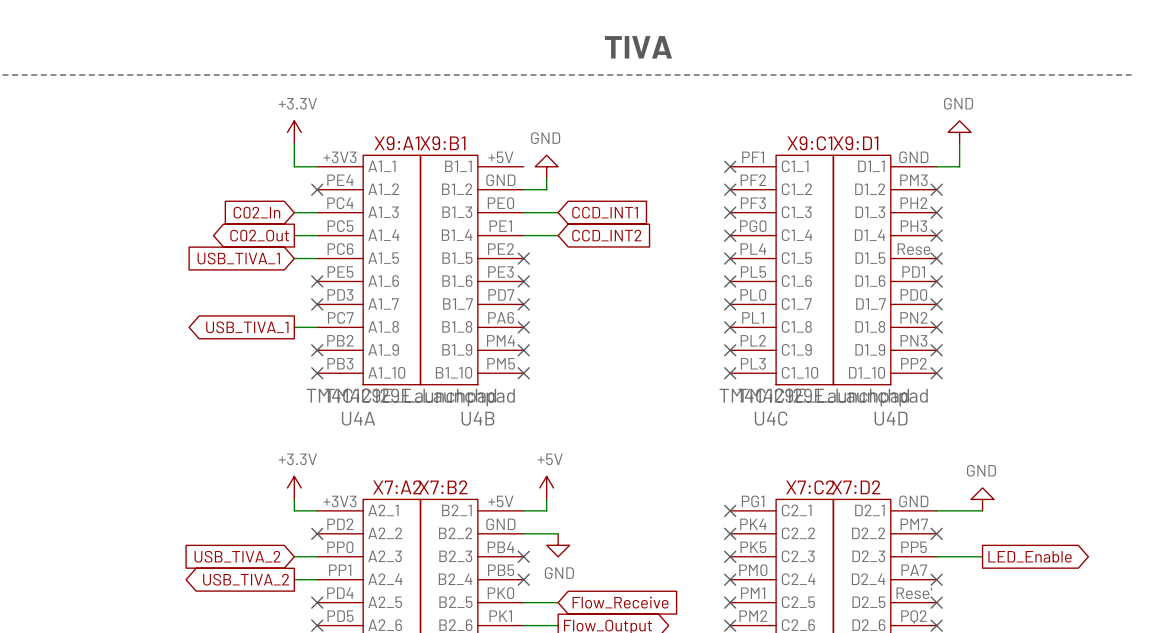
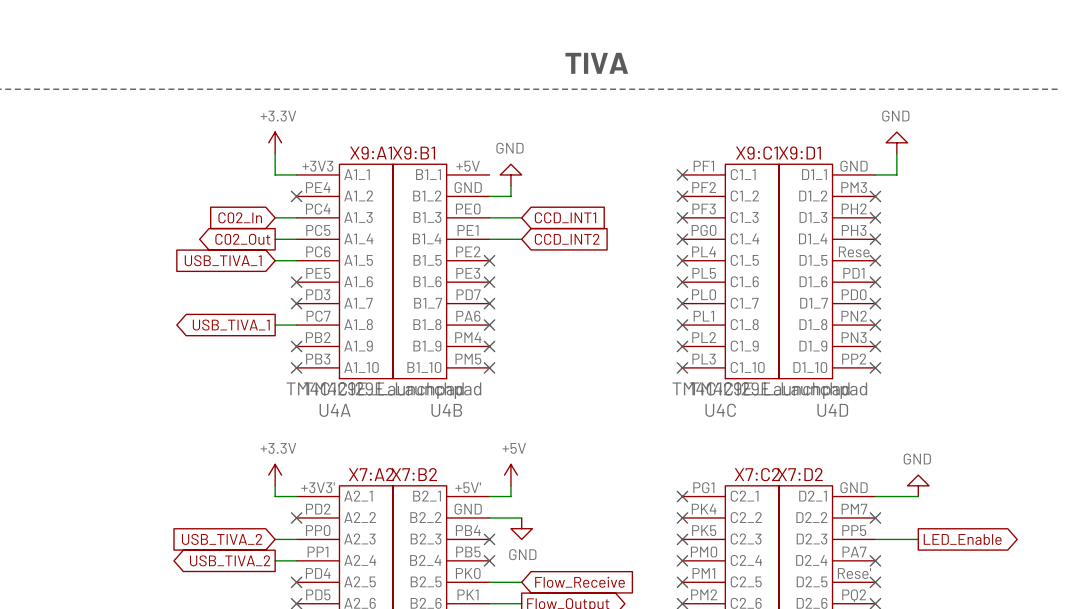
part pin number: +3V3 (340, 501) -> +3V3' (318, 487)
part pin number: +5V (500, 501) -> +5V' (468, 487)

